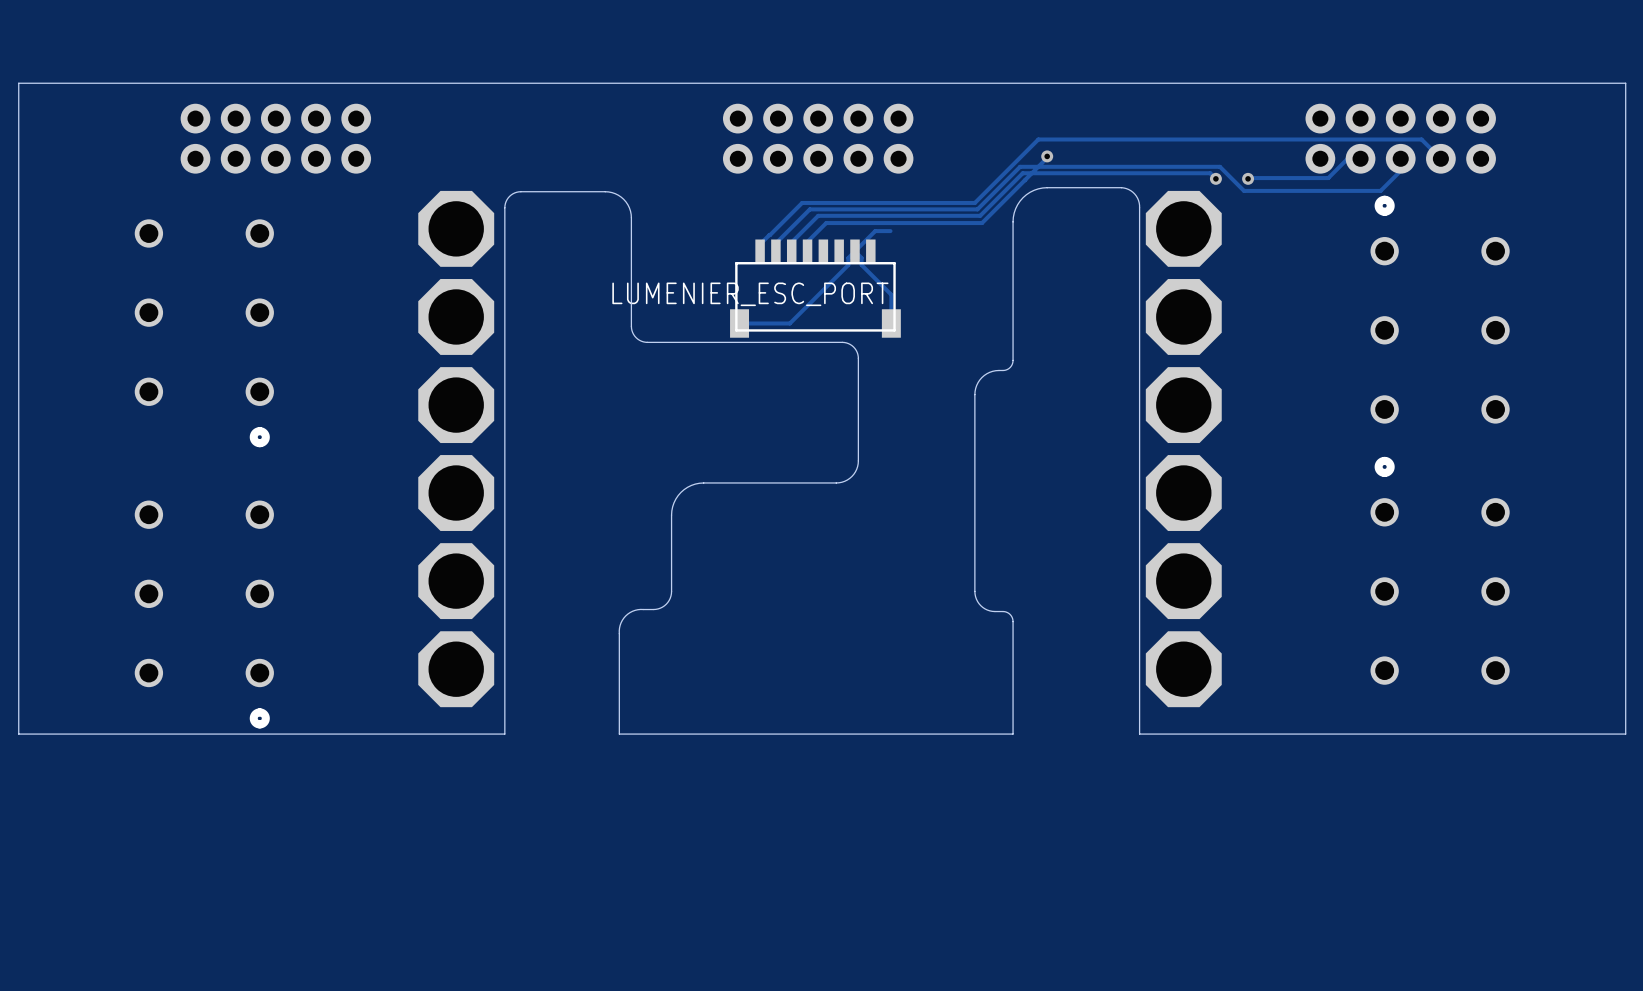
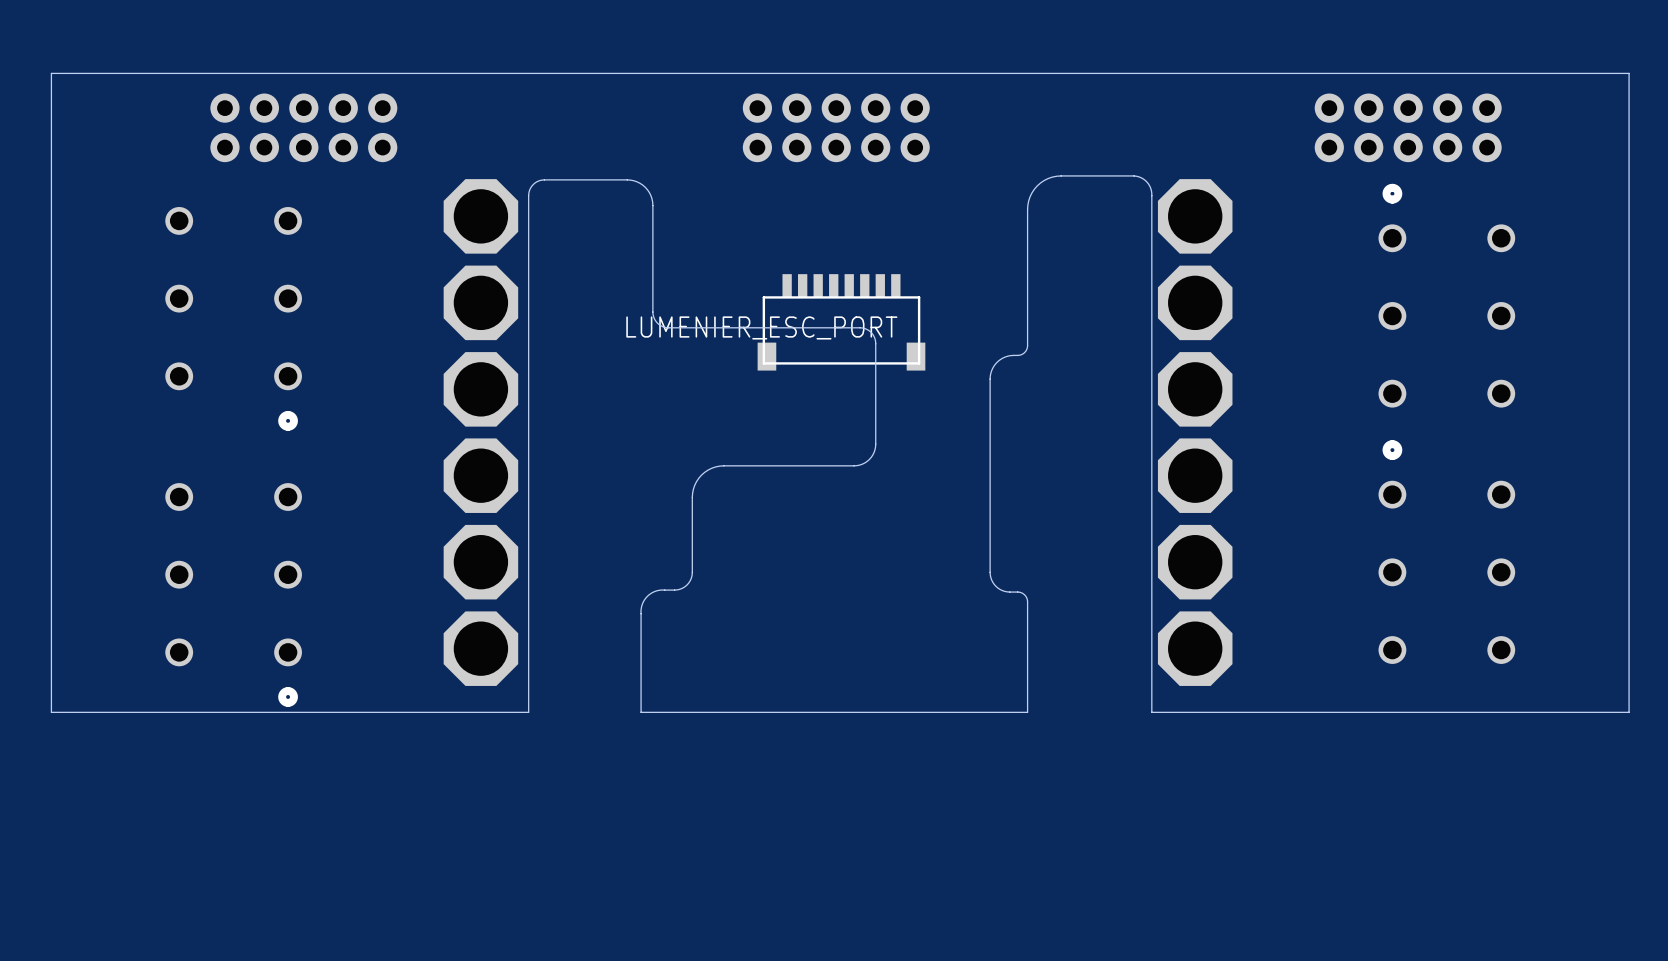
track: (1047, 156) (1047, 158) (982, 223) (826, 223) (807, 241) (807, 251) -> none
via: (1047, 156) -> none
track: (1360, 158) (1347, 158) (1328, 178) (1248, 178) -> none
track: (1400, 158) (1400, 170) (1380, 190) (1244, 190) (1219, 166) (1020, 166) (977, 209) (809, 209) (775, 243) (775, 251) -> none
track: (1440, 158) (1421, 139) (1038, 139) (974, 202) (802, 202) (760, 244) (760, 251) -> none
track: (1215, 178) (1210, 173) (1022, 173) (980, 215) (818, 215) (791, 242) (791, 251) -> none
via: (1215, 178) -> none
via: (1248, 178) -> none
track: (890, 231) (875, 231) (848, 258) (848, 265) (789, 323) (739, 323) -> none
track: (854, 251) (861, 258) (861, 265) (891, 294) (891, 323) -> none
LUMENIER_ESC_PORT position: (815, 288) -> (841, 322)
LUMENIER_ESC_PORT name position: LUMENIER_ESC_PORT (750, 294) -> LUMENIER_ESC_PORT (761, 327)

